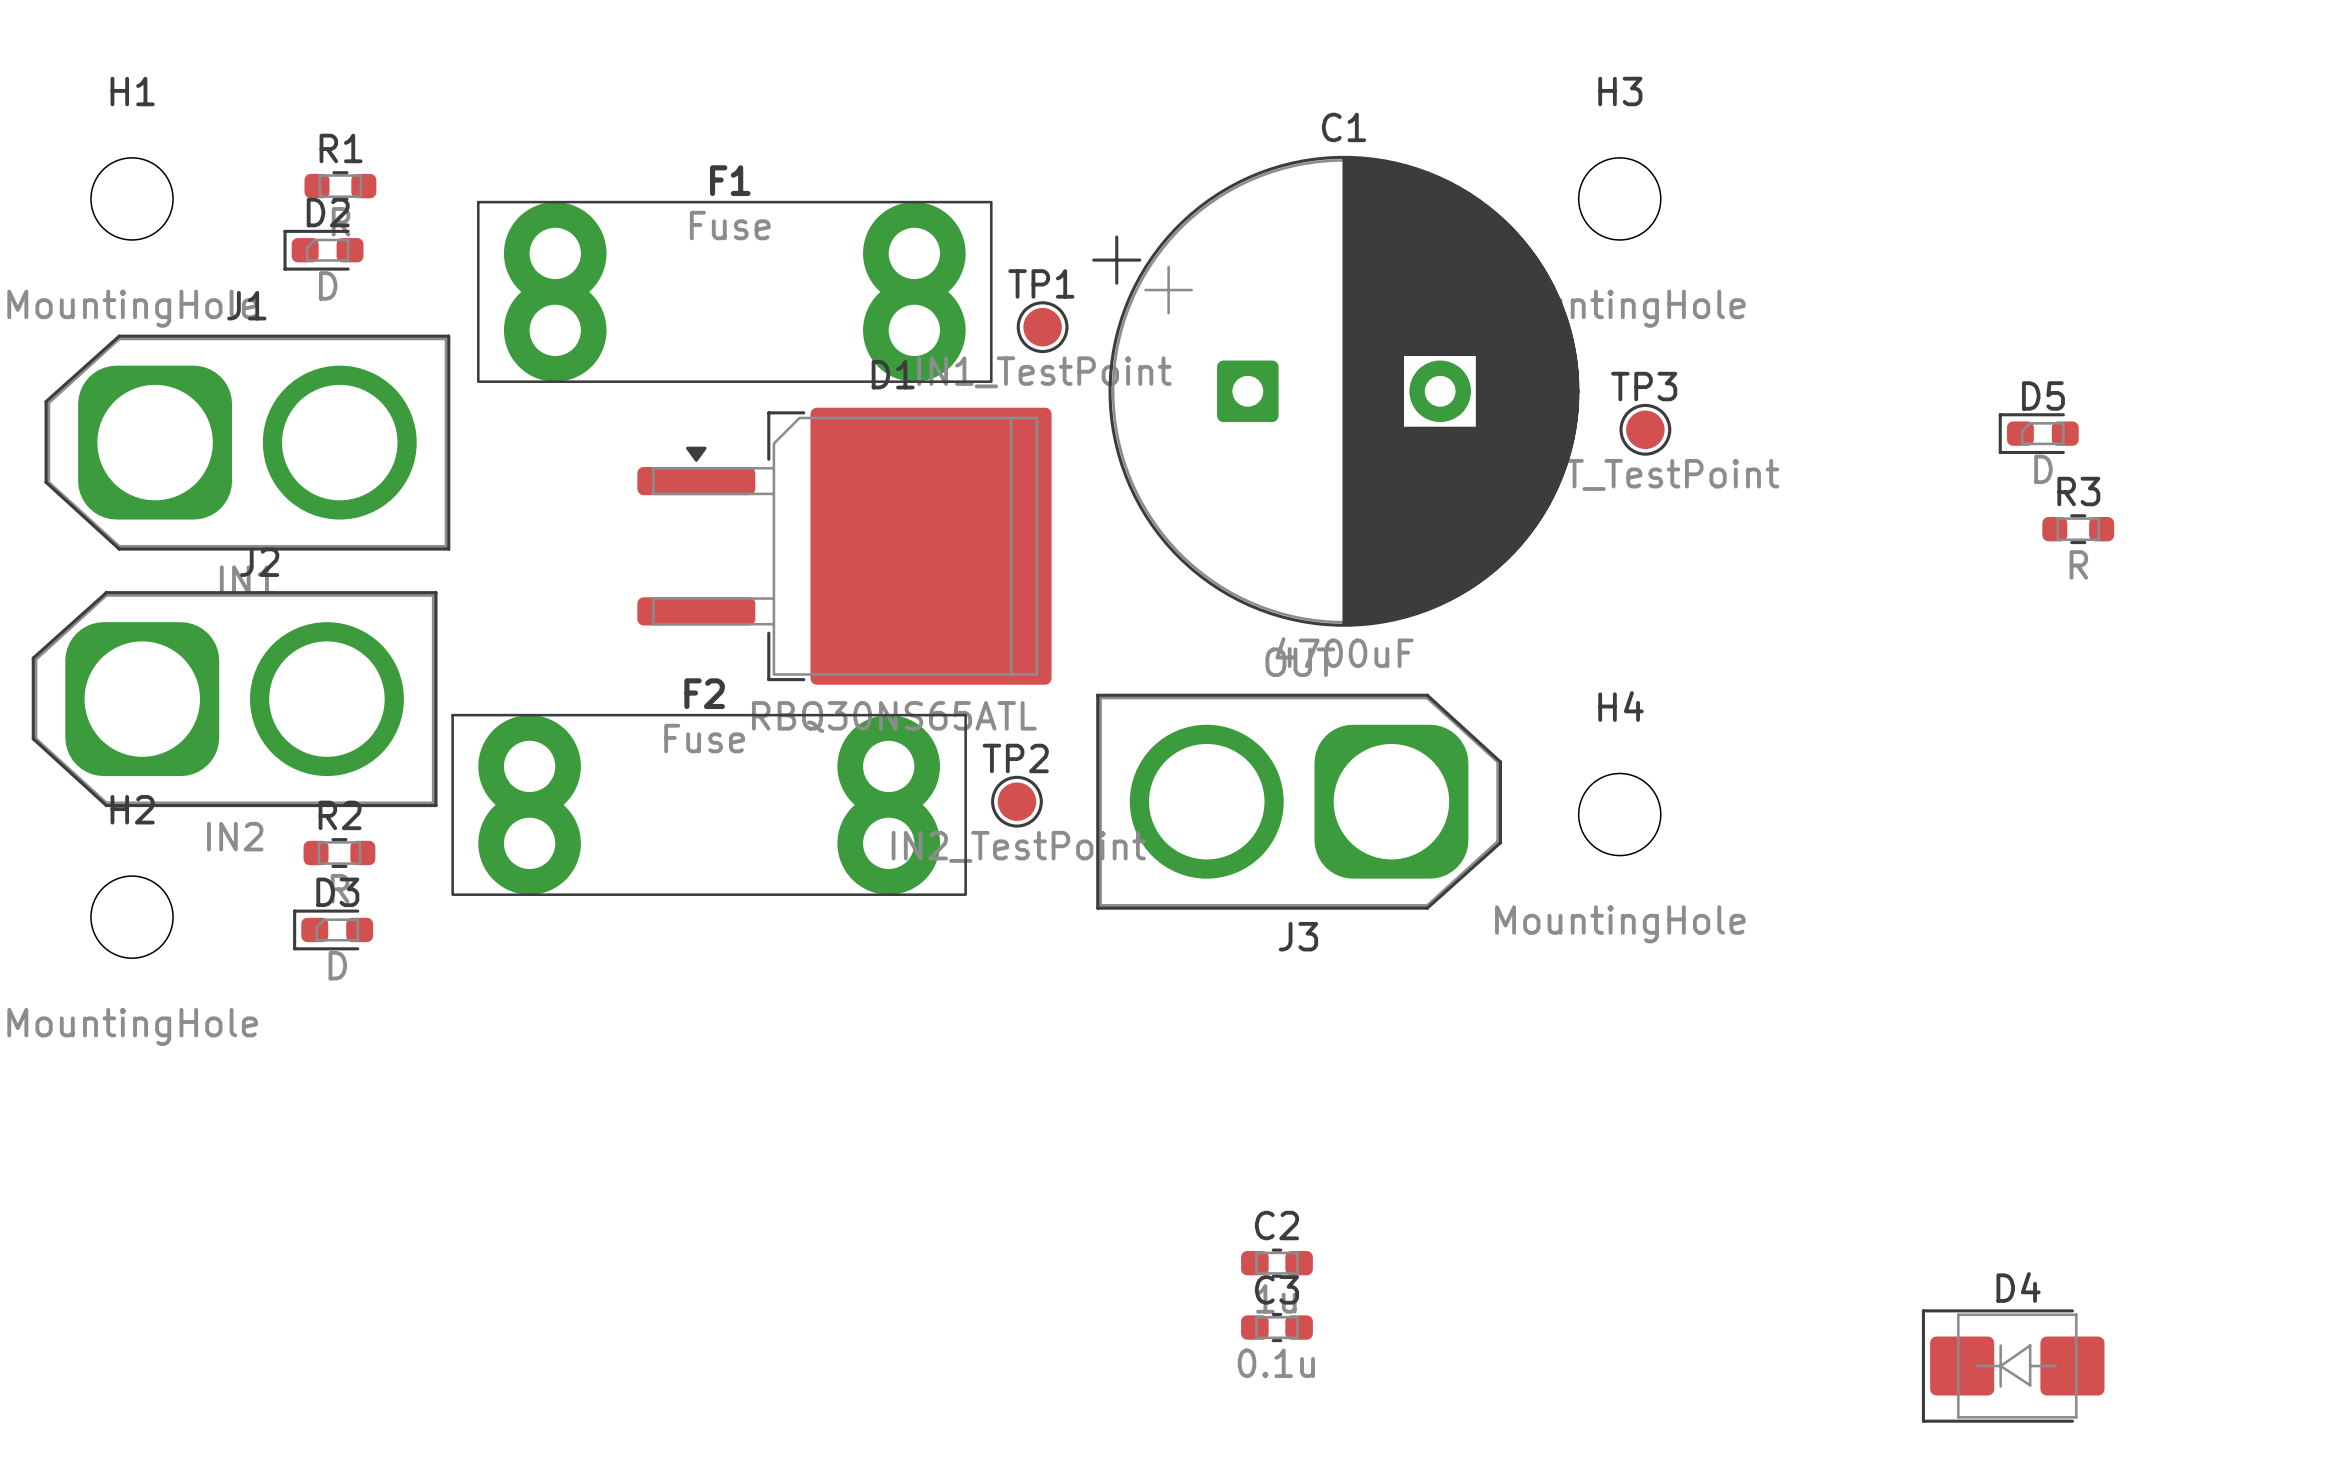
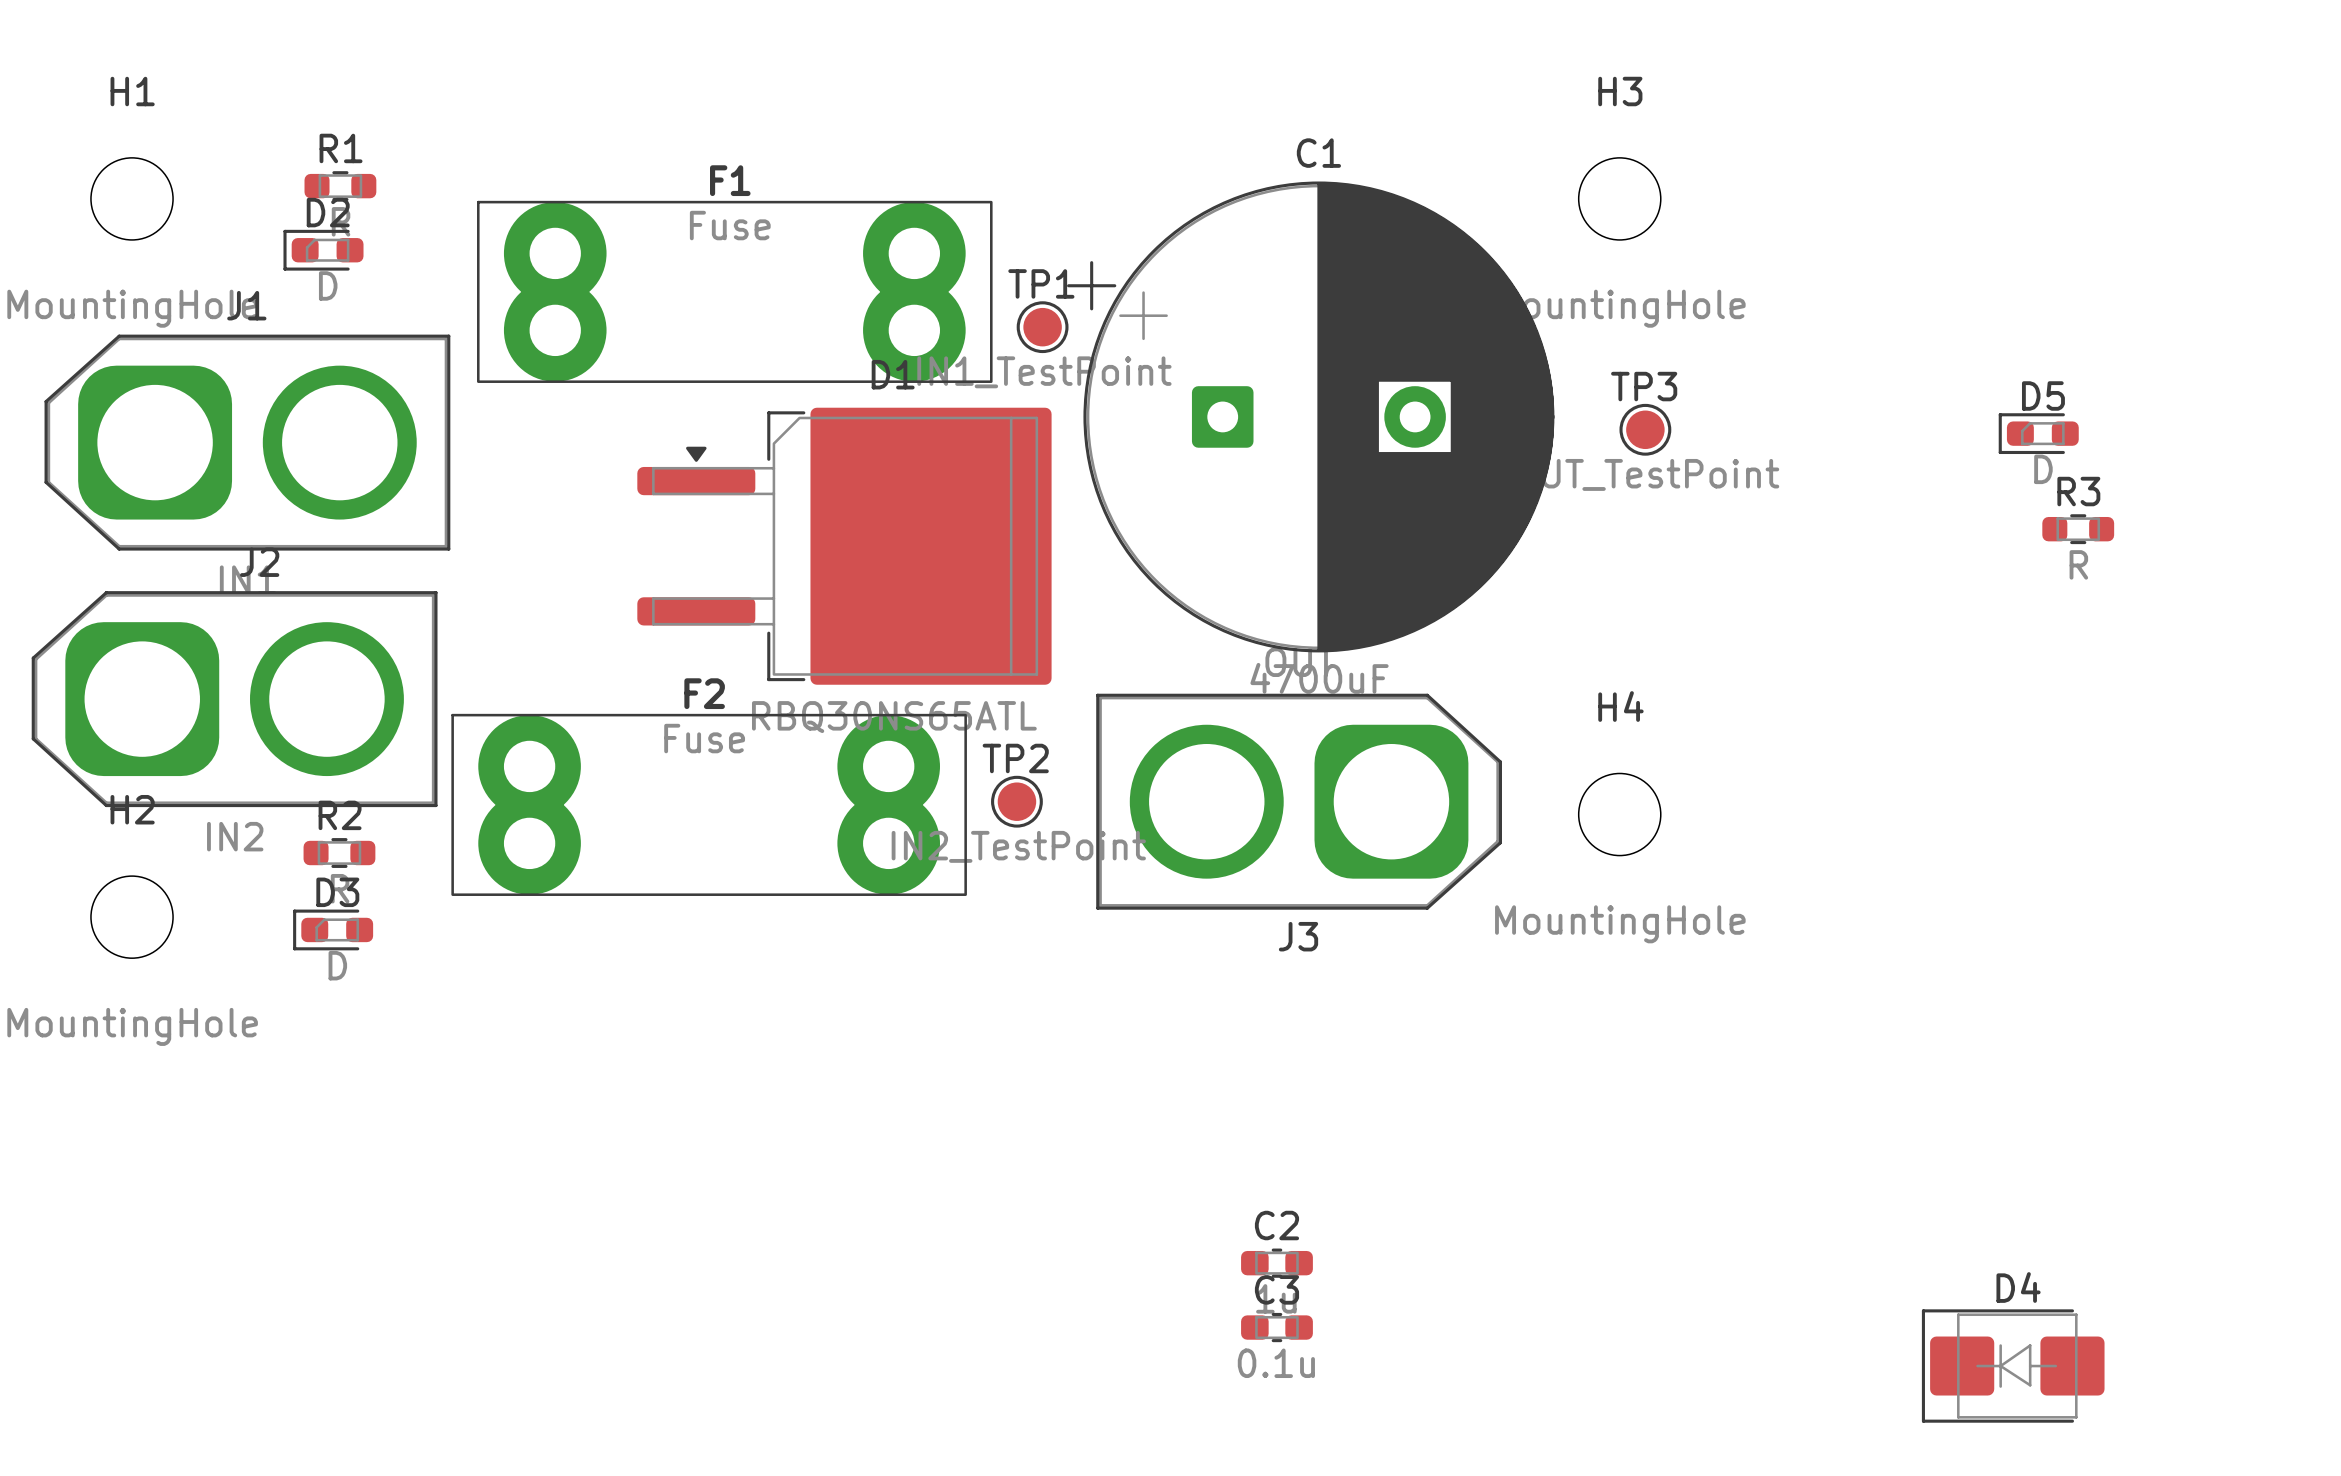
C1 position: (1335, 391) -> (1310, 416)

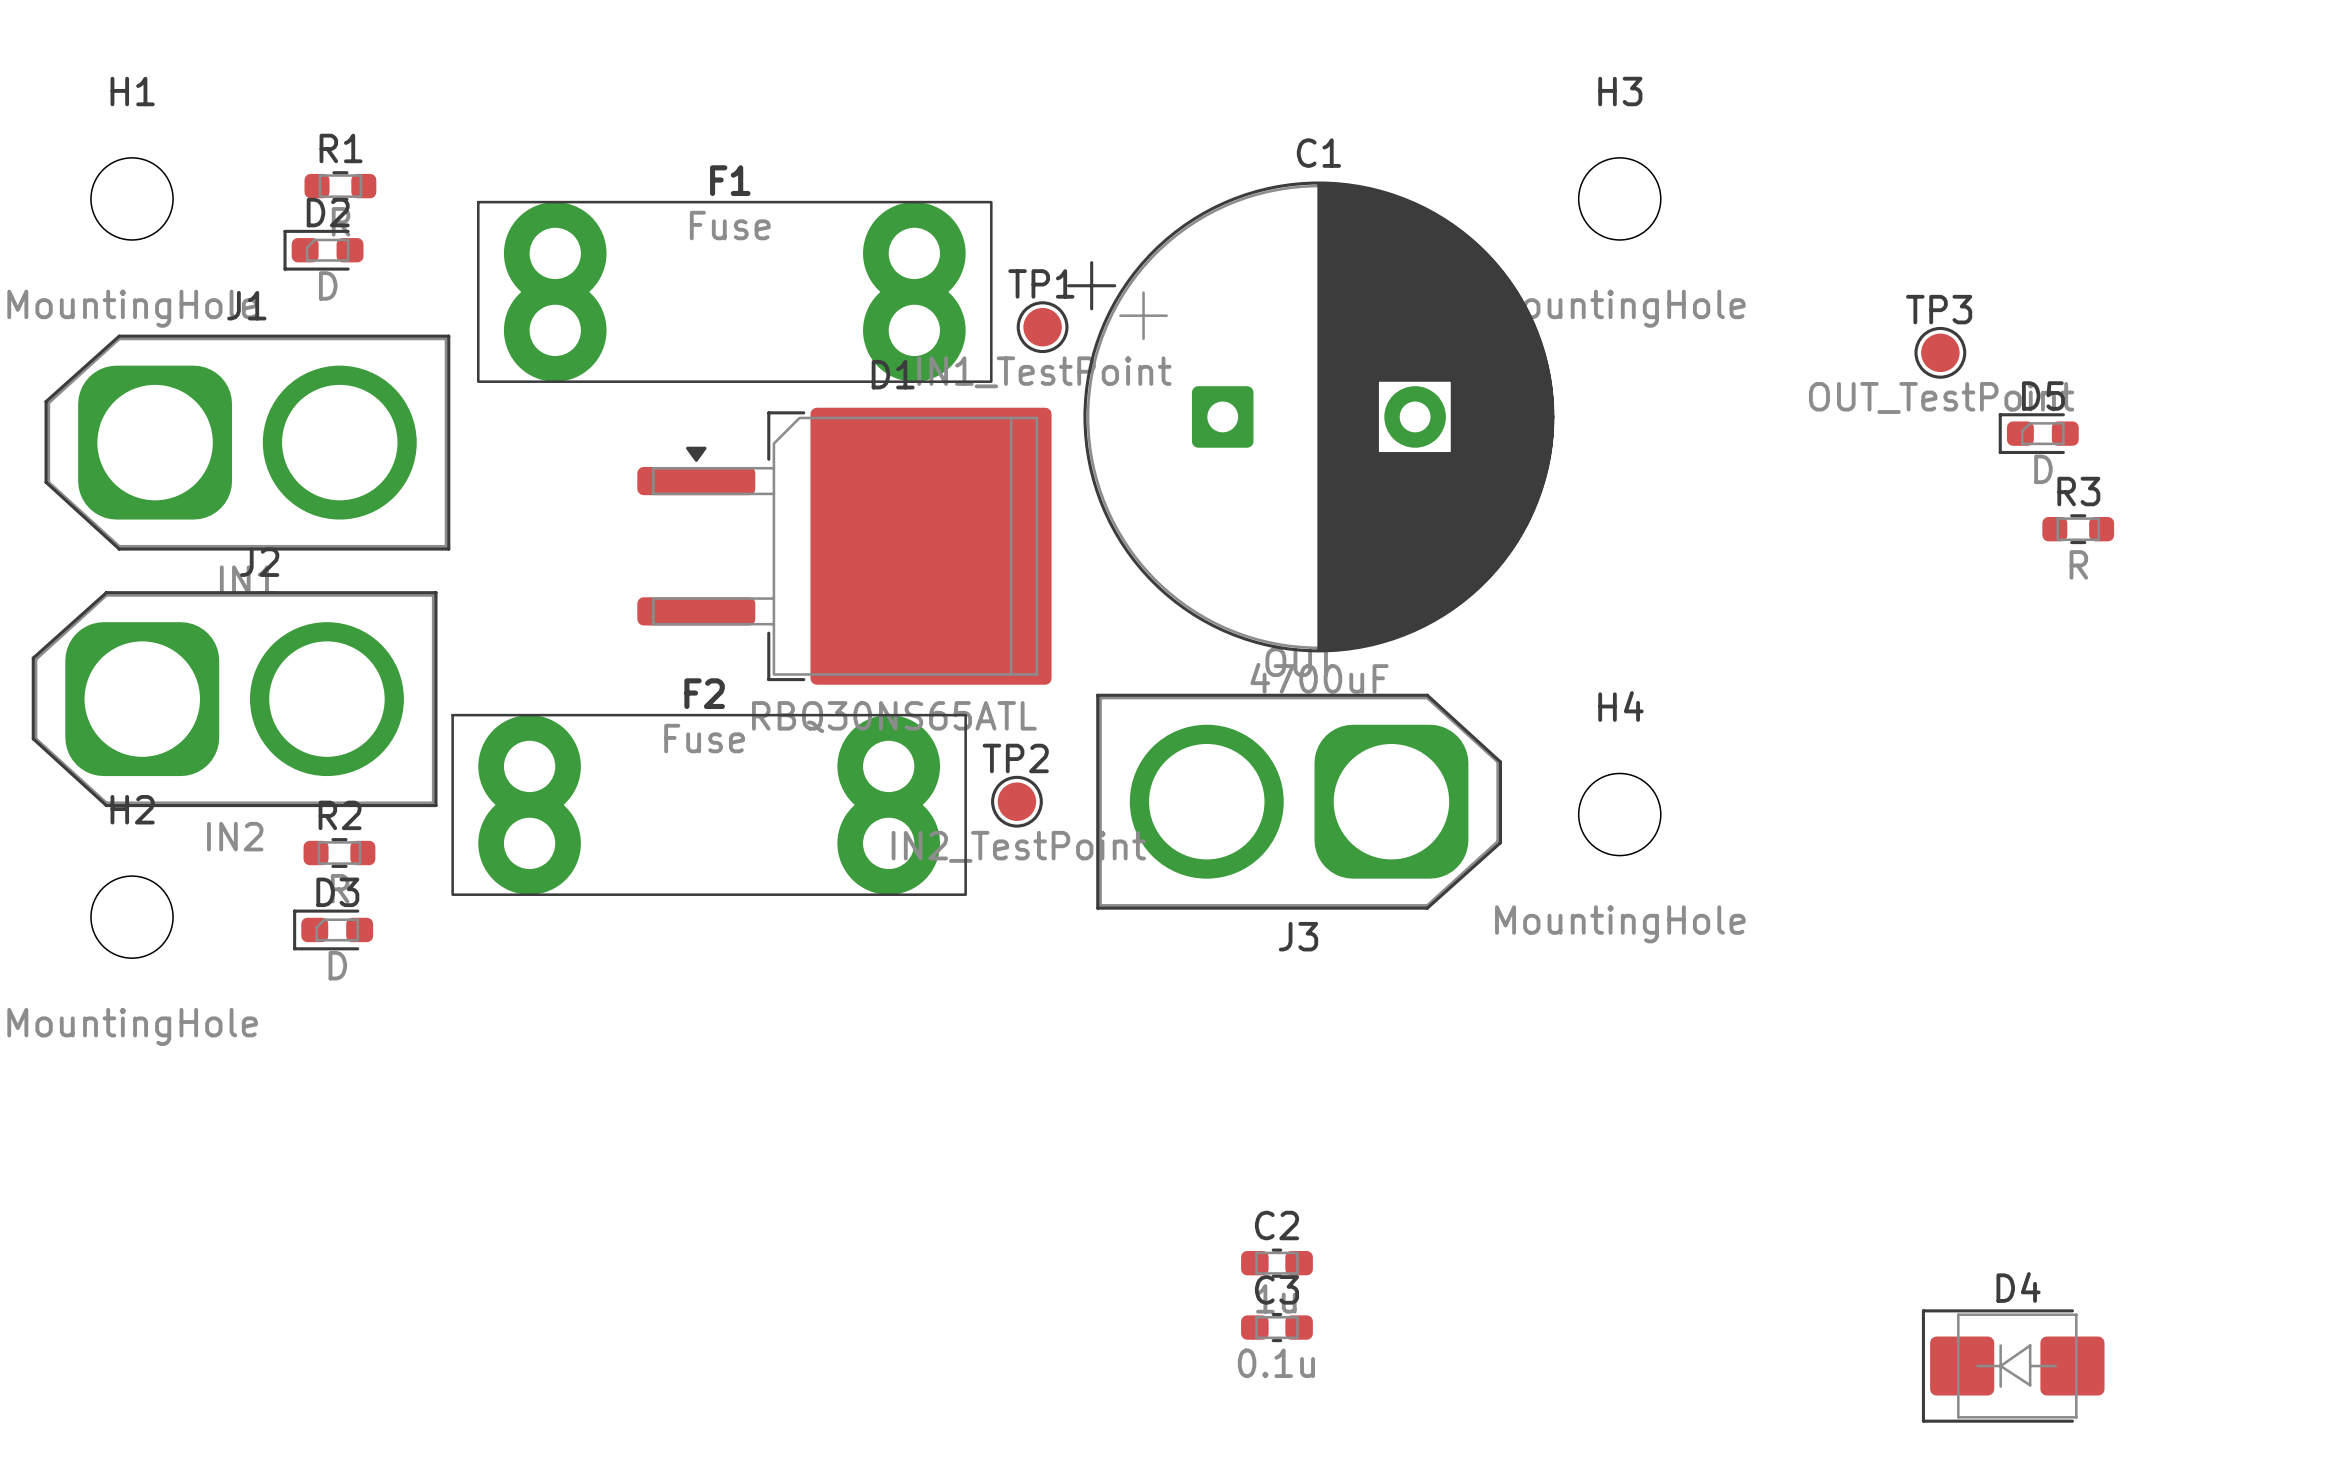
TP3 position: (1645, 429) -> (1940, 352)

